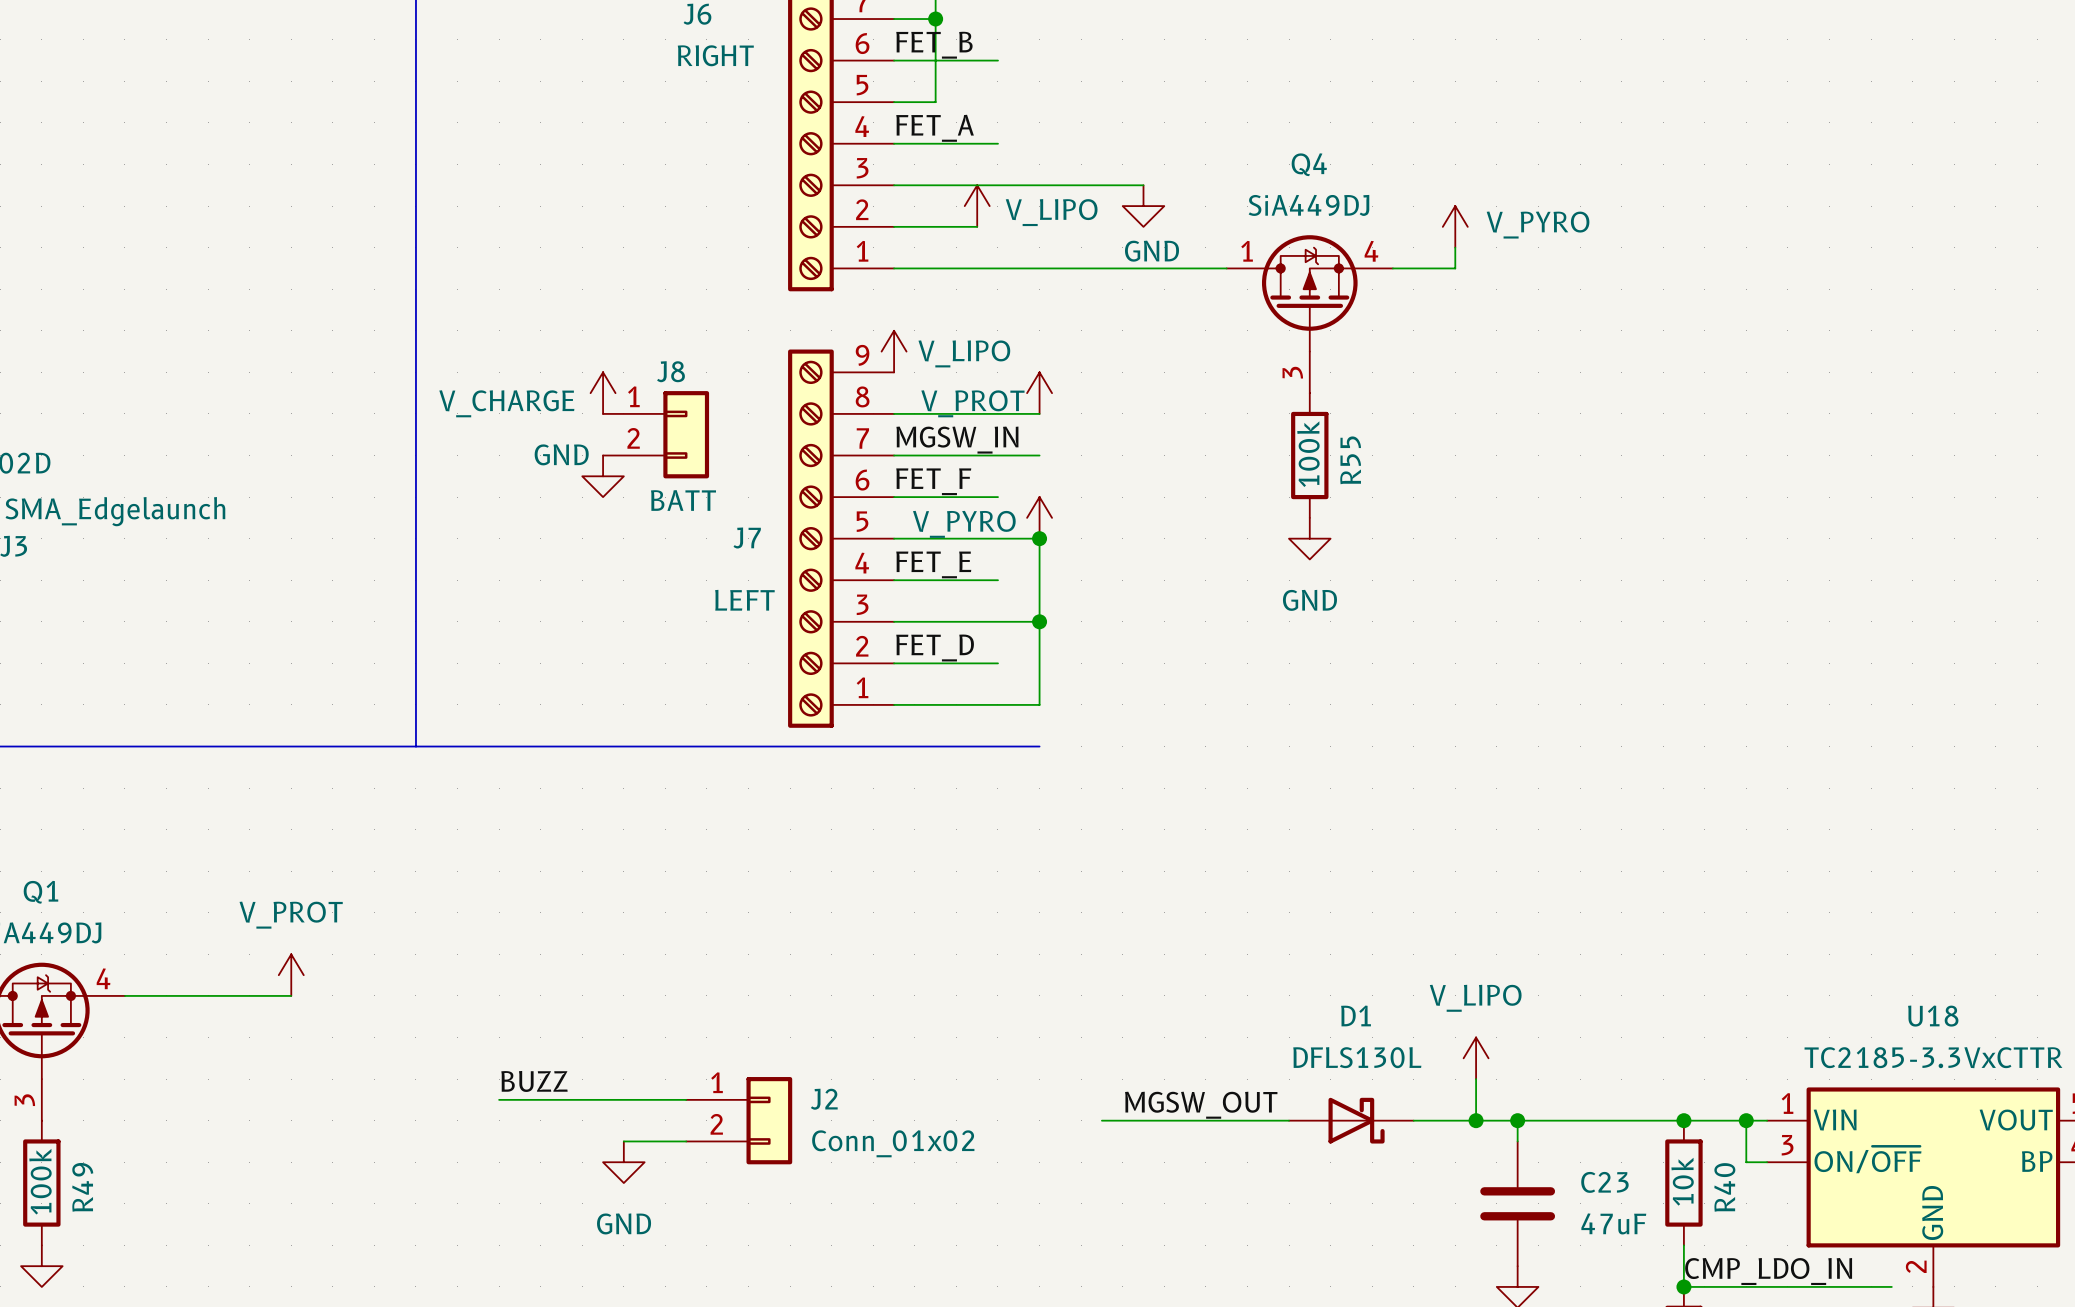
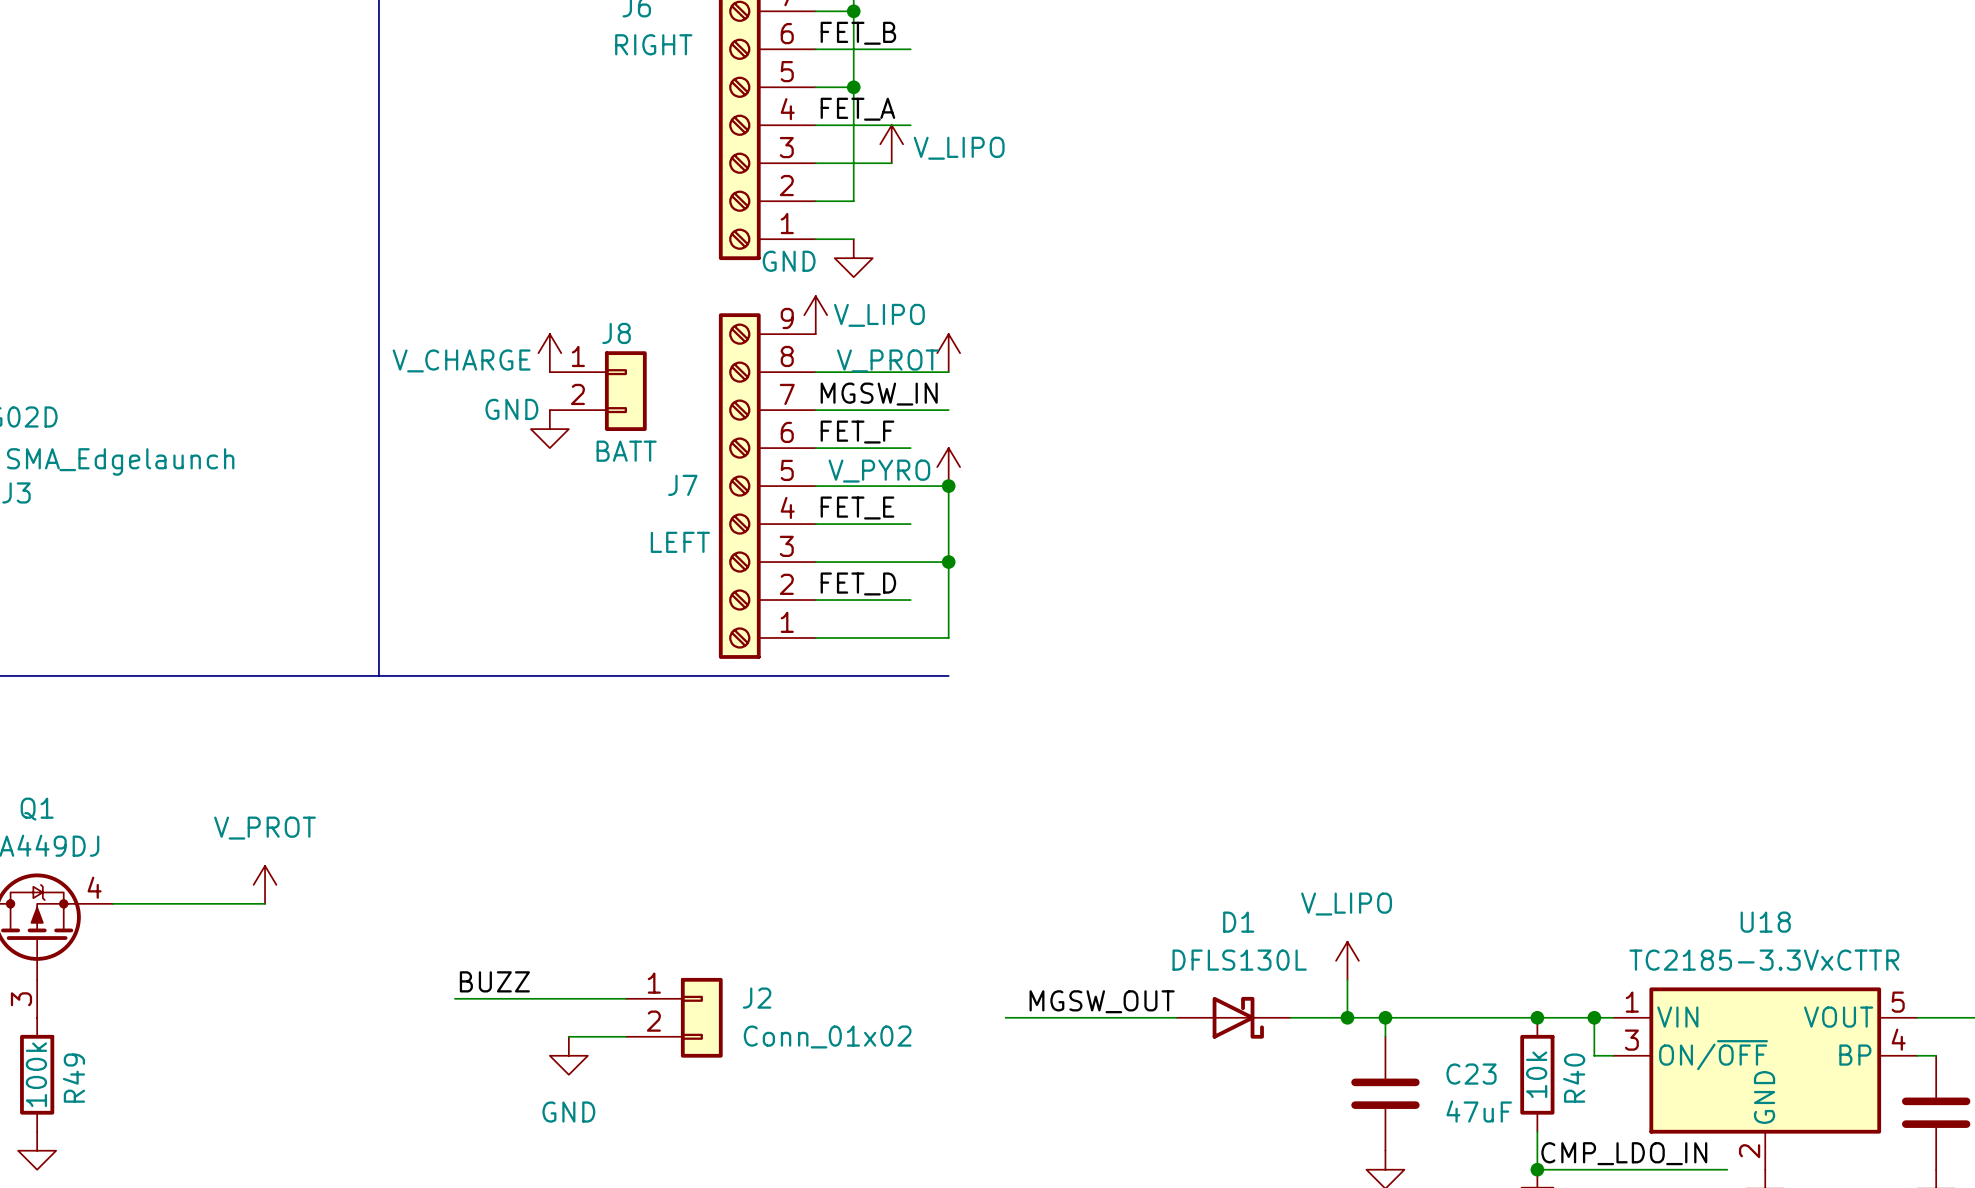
junction: none -> (853, 87)
wire: (977, 185) (1143, 185) -> none
power symbol position: V_LIPO (977, 206) -> V_LIPO (891, 144)
power symbol position: GND (1143, 206) -> GND (853, 258)
wire: (935, 226) (977, 226) -> (853, 201) (853, 87)
power symbol: V_PYRO (1455, 226) -> none
wire: (1455, 247) (1455, 268) (1392, 268) -> none
power symbol text position: GND (1152, 251) -> GND (789, 261)
wire: (935, 268) (1226, 268) -> none
Q4: SiA449DJ (1309, 314) -> none
R55: 100k (1309, 455) -> none
power symbol: GND (1309, 538) -> none

